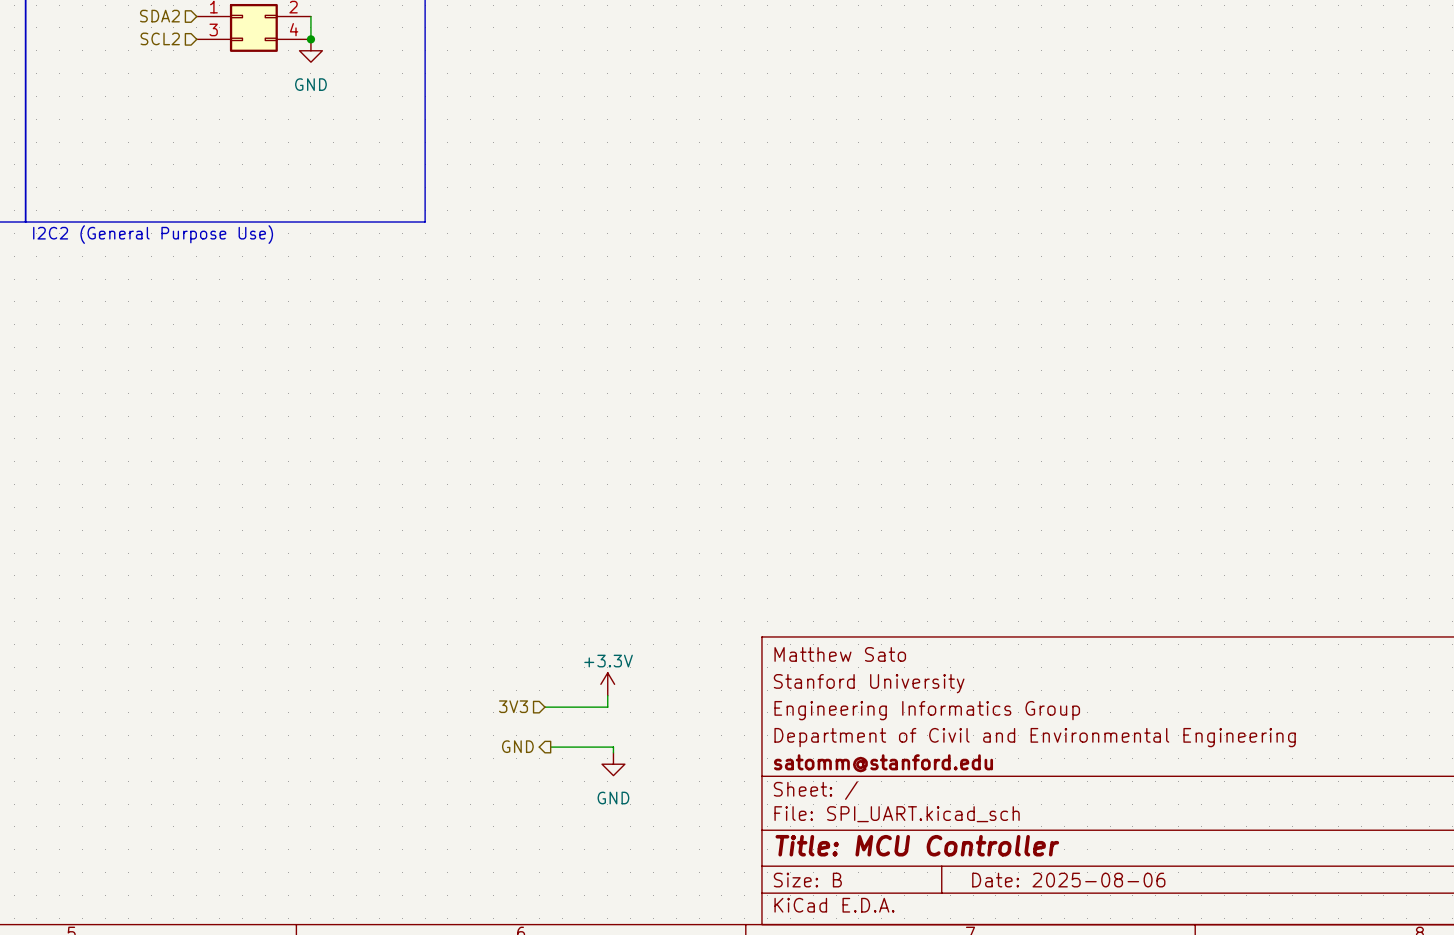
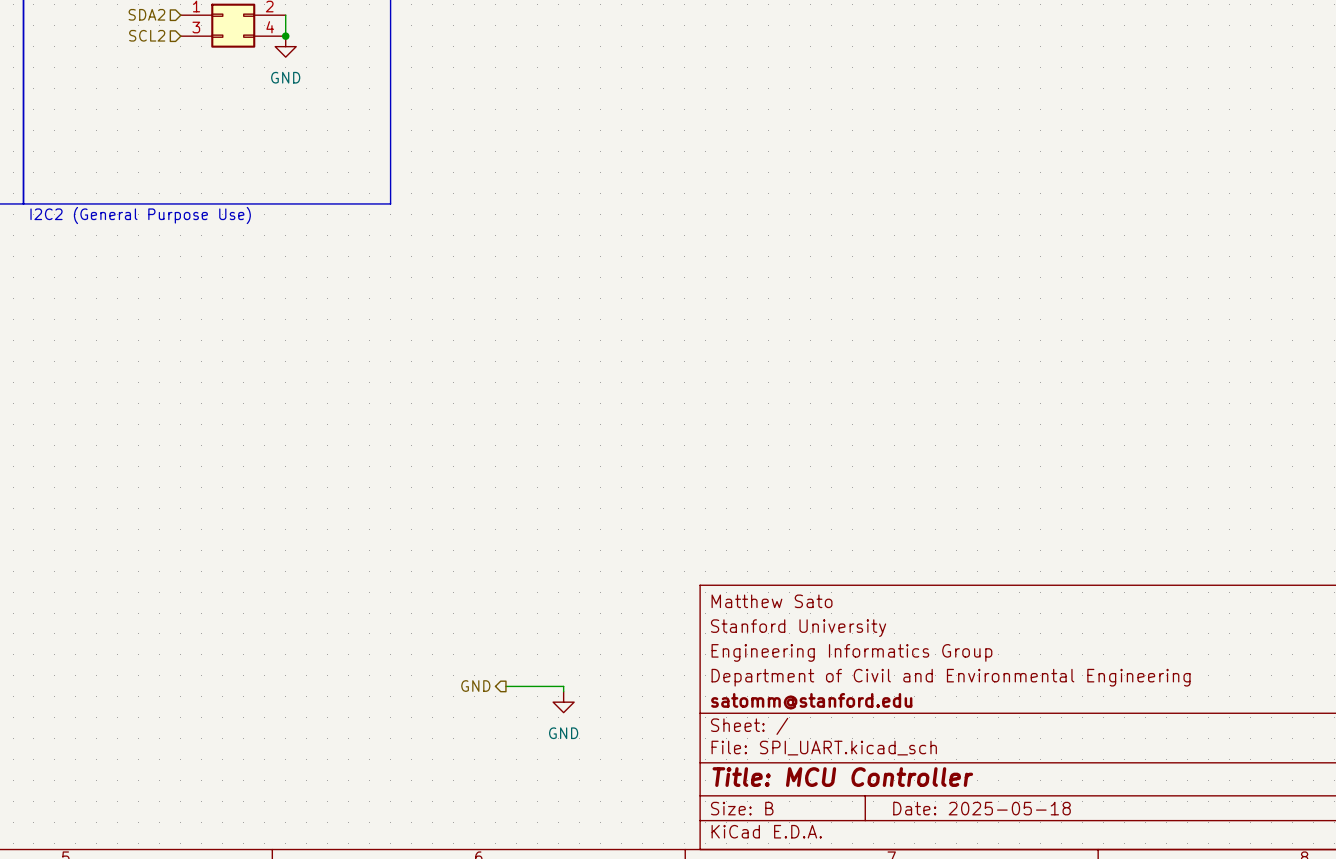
power symbol: +3.3V (607, 684) -> none
wire: (607, 695) (607, 707) (544, 707) -> none
hierarchical label: 3V3 (513, 706) -> none
title block: Date: 2025-08-06 (1068, 880) -> Date: 2025-05-18 (982, 808)

